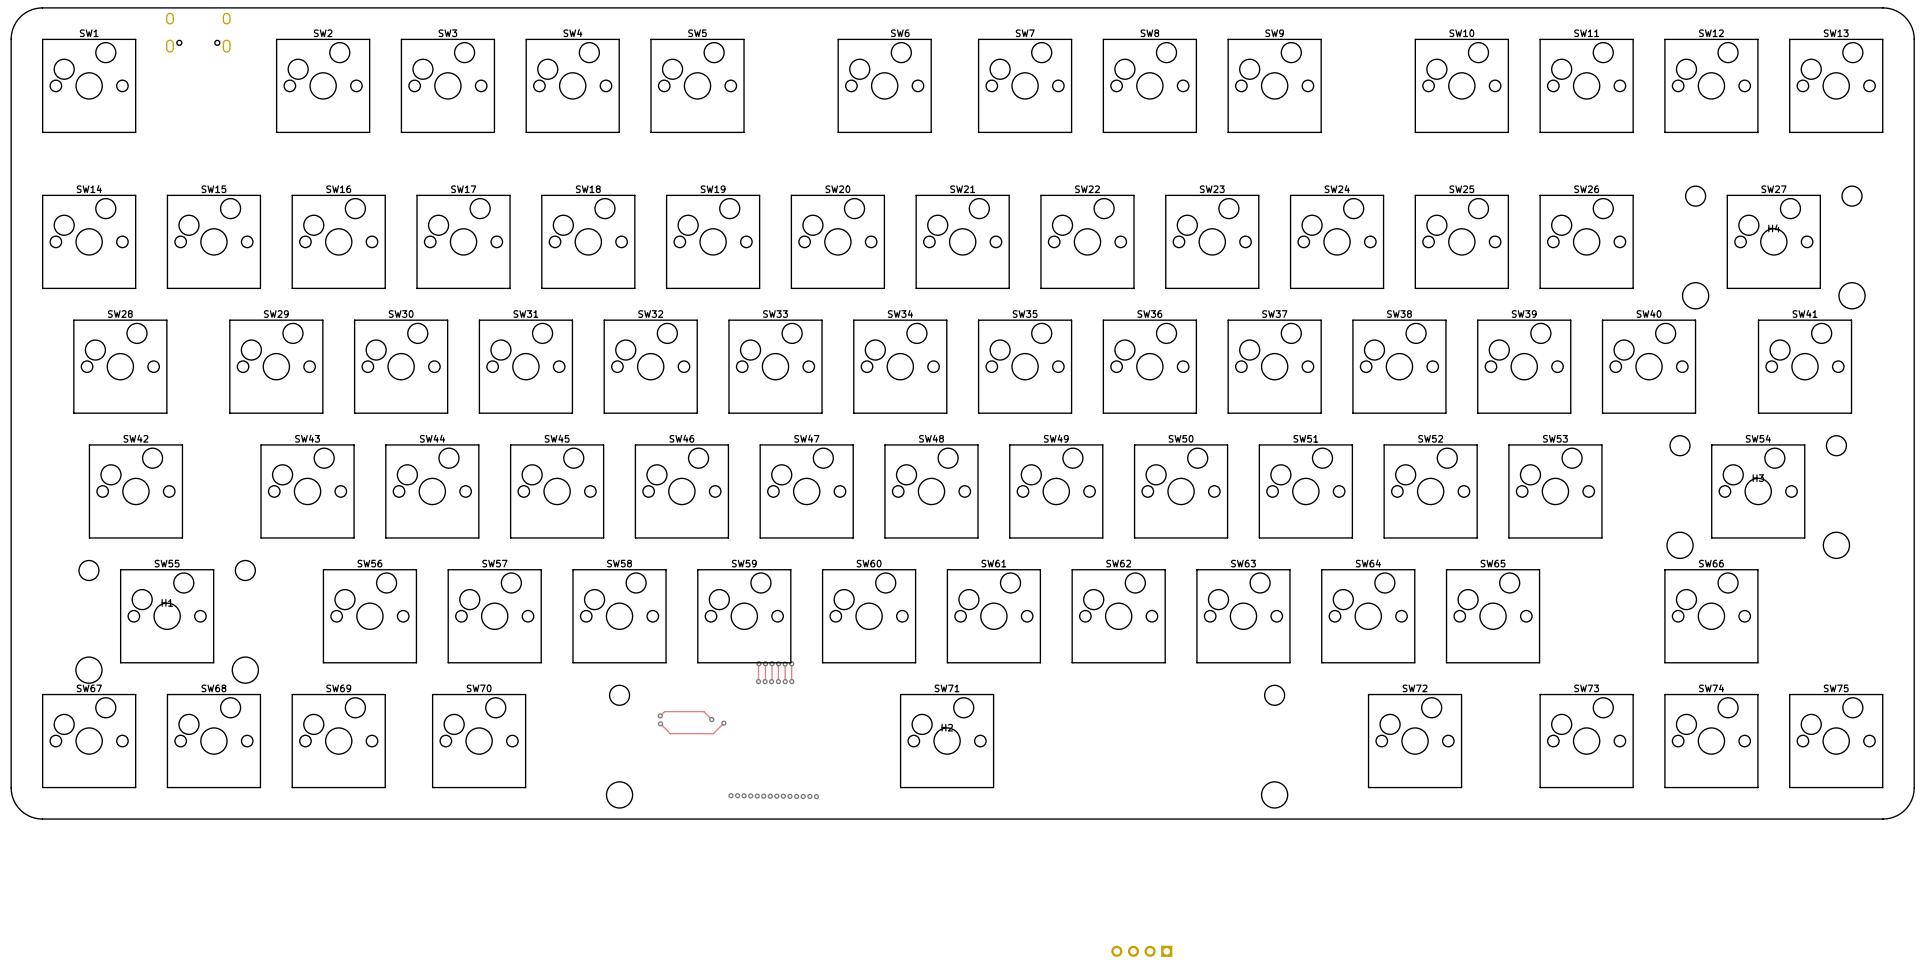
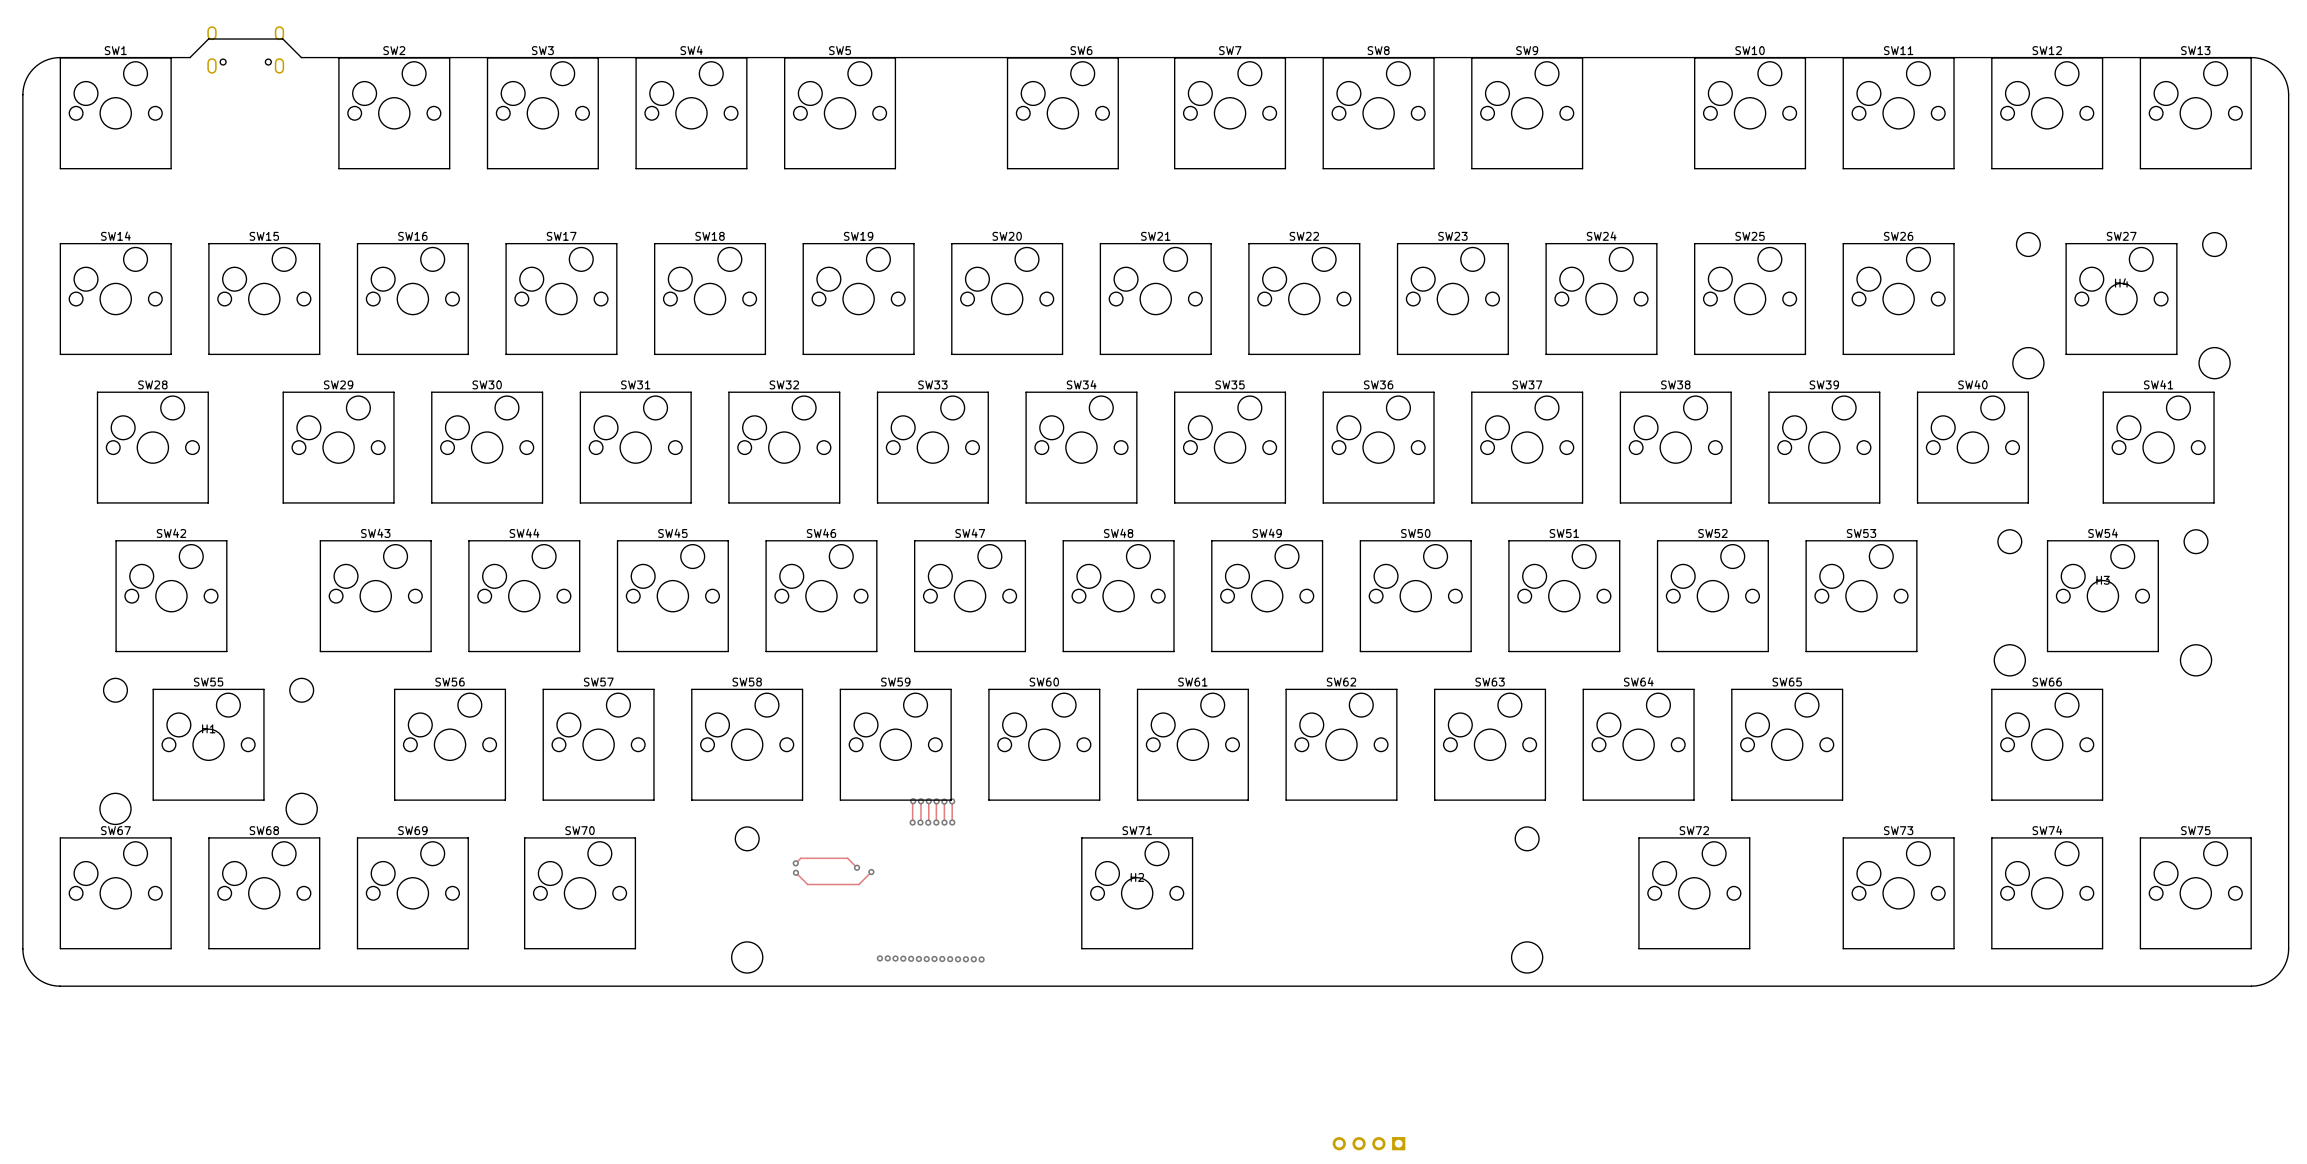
board edge: (11, 70) (11, 35) (14, 25) (25, 12) (42, 7) (1883, 7) (1899, 12) (1911, 25) (1914, 35) (1914, 70) -> (22, 94) (28, 74) (36, 65) (47, 59) (60, 57) (190, 57) (208, 39) (282, 39) (301, 57) (2251, 57) (2263, 59) (2277, 68) (2286, 82) (2288, 94)

